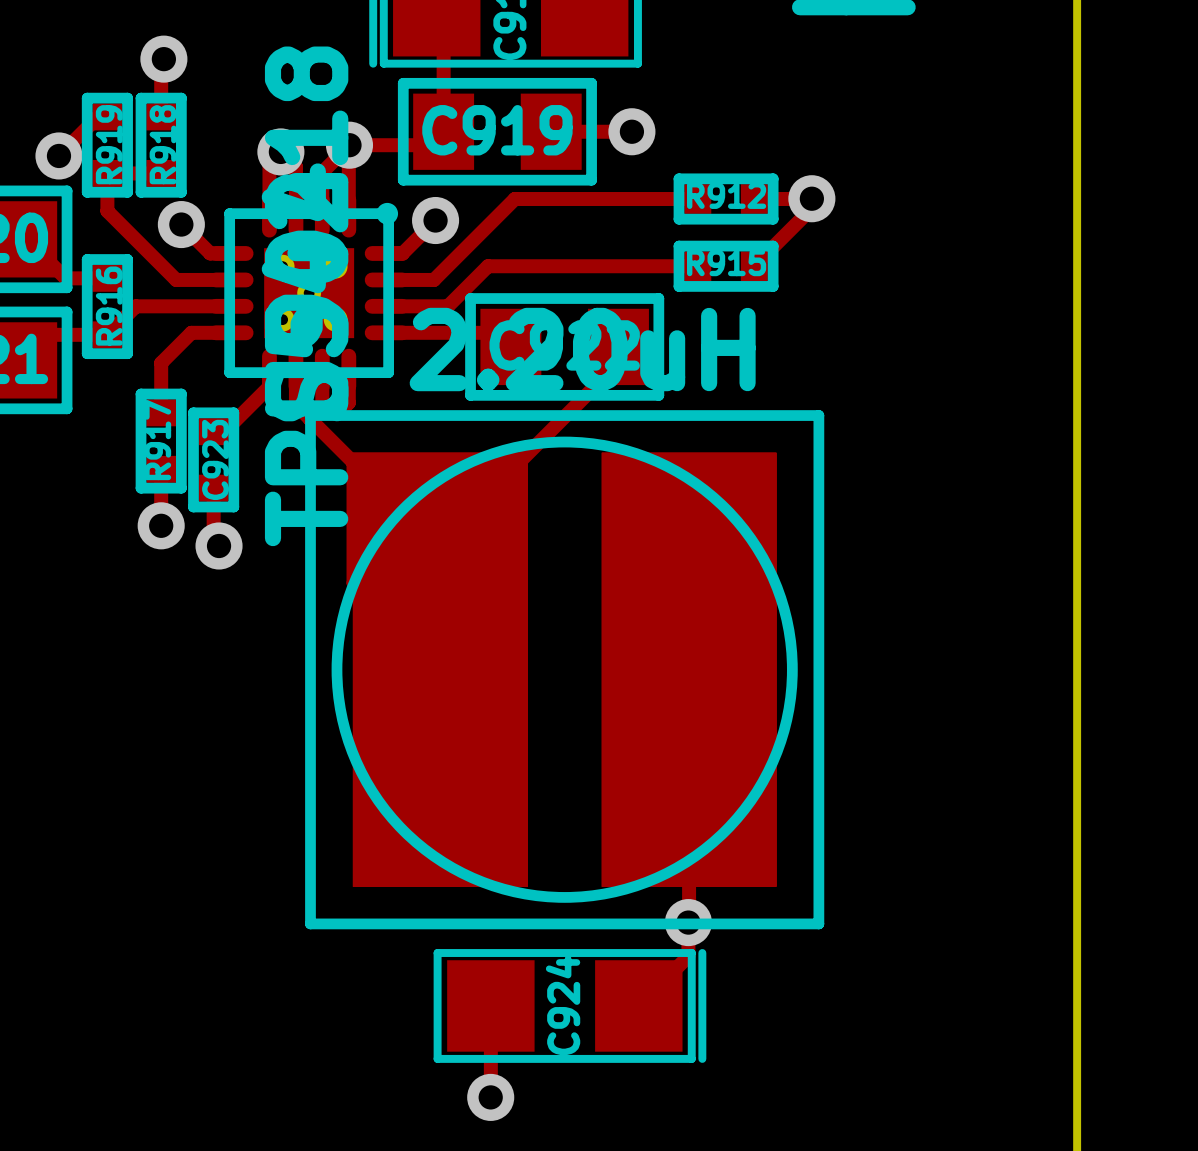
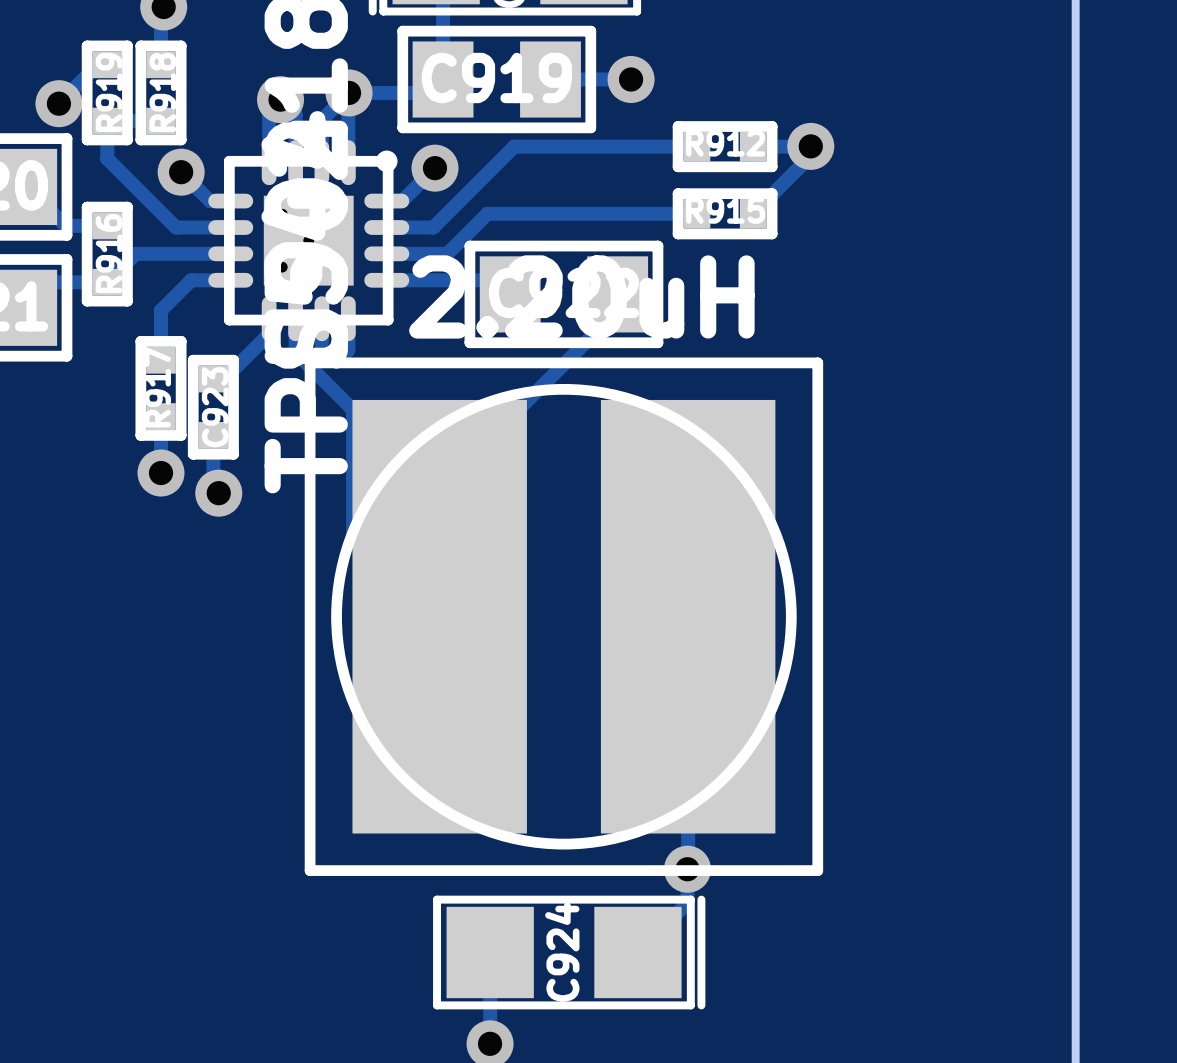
part footprint: [305, 410, 825, 930] -> [304, 357, 824, 876]

